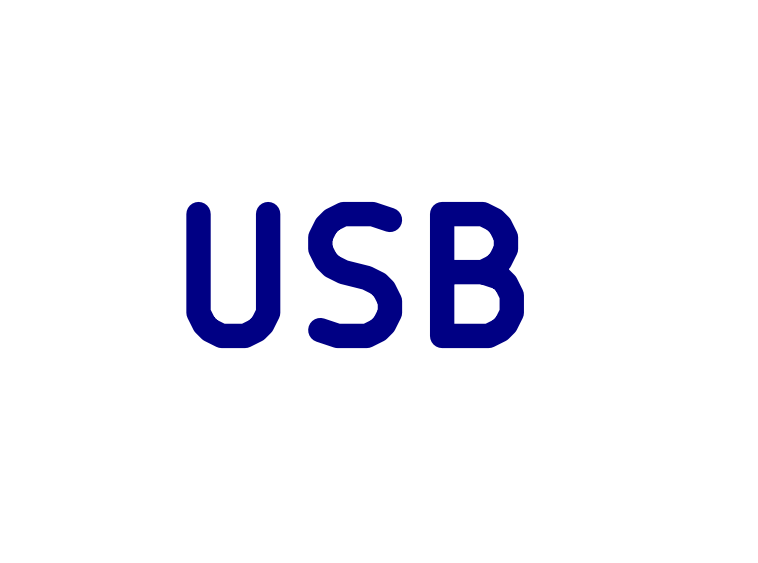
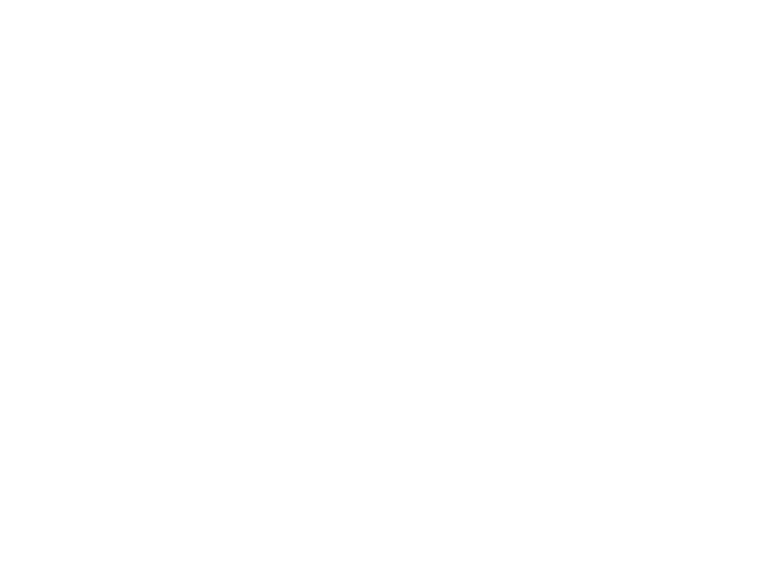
text: USB (355, 275) -> none

